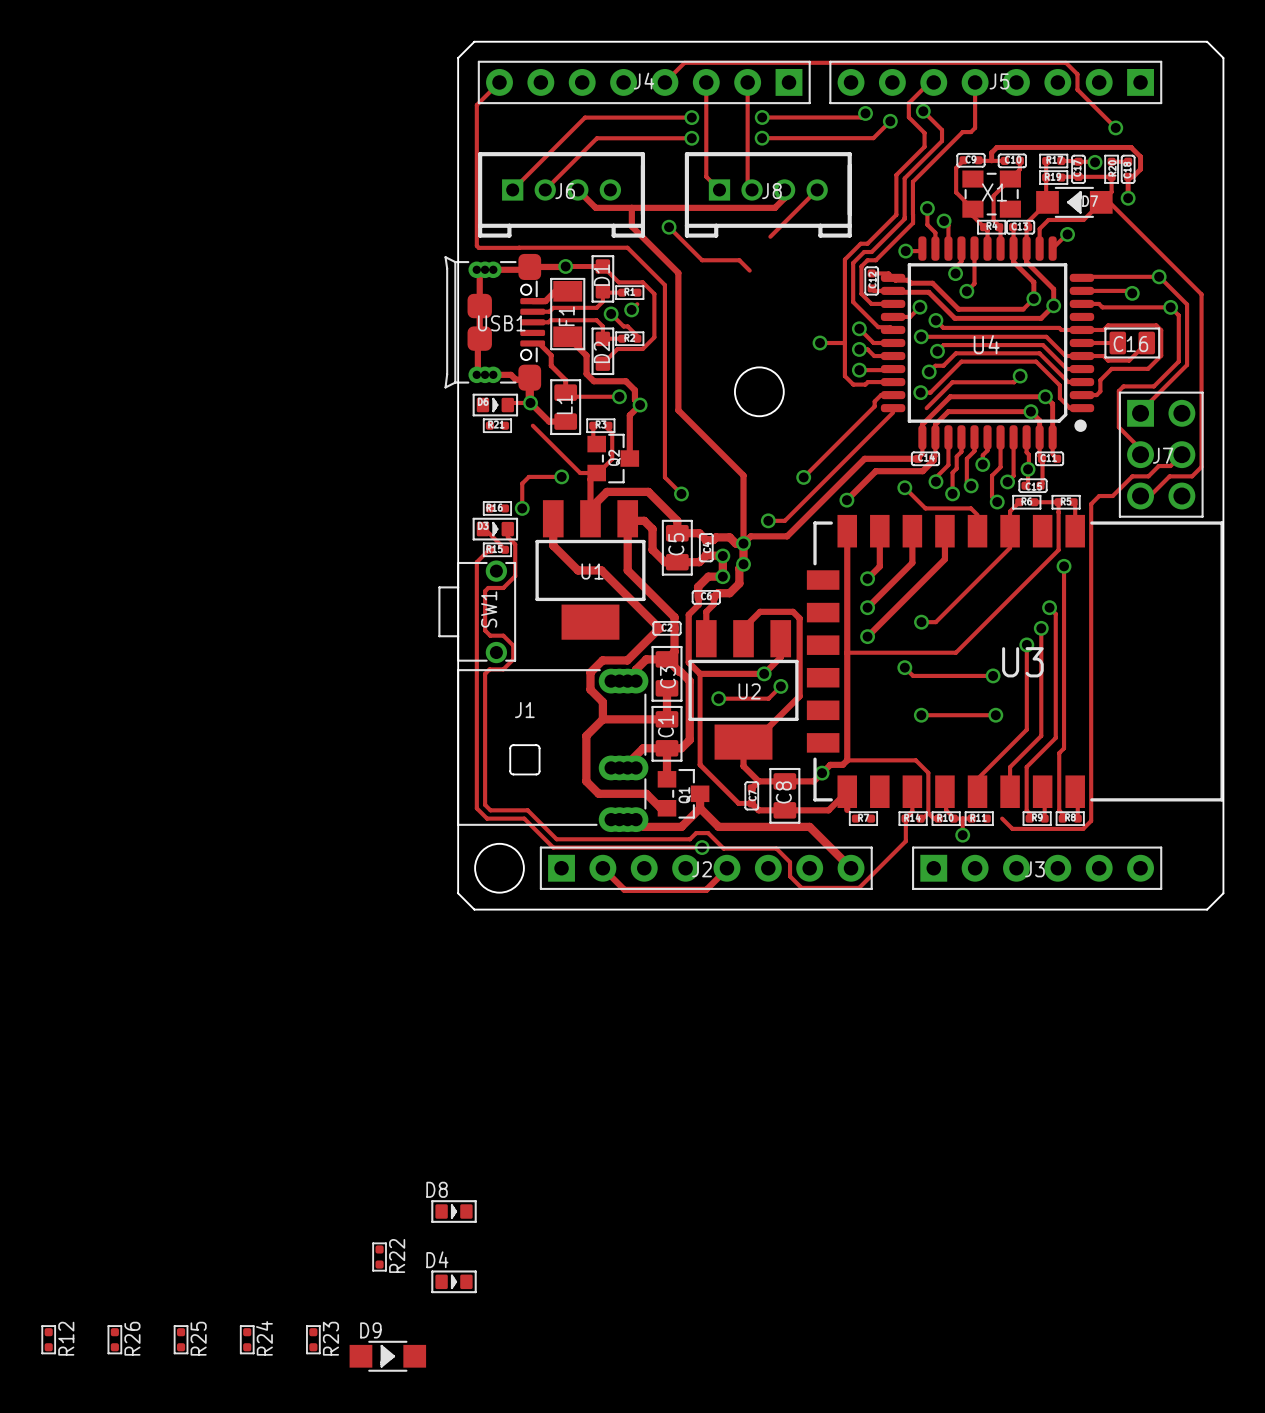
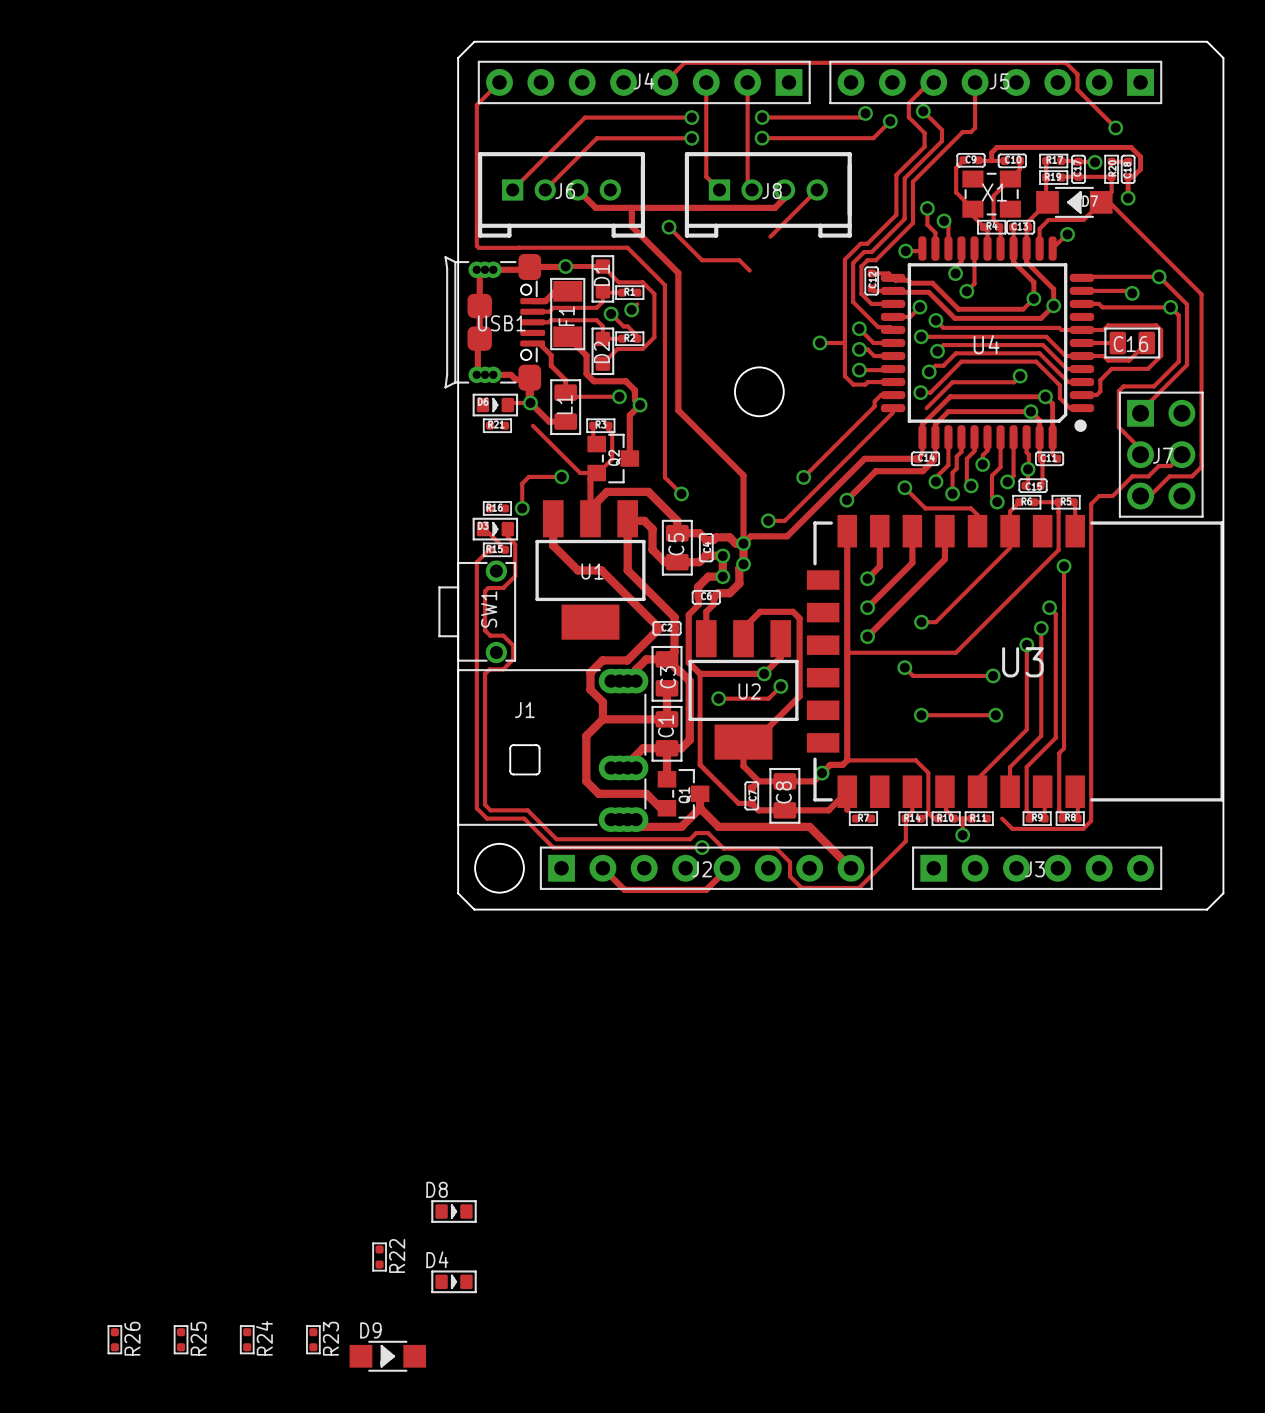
R12: (48, 1339) -> none

